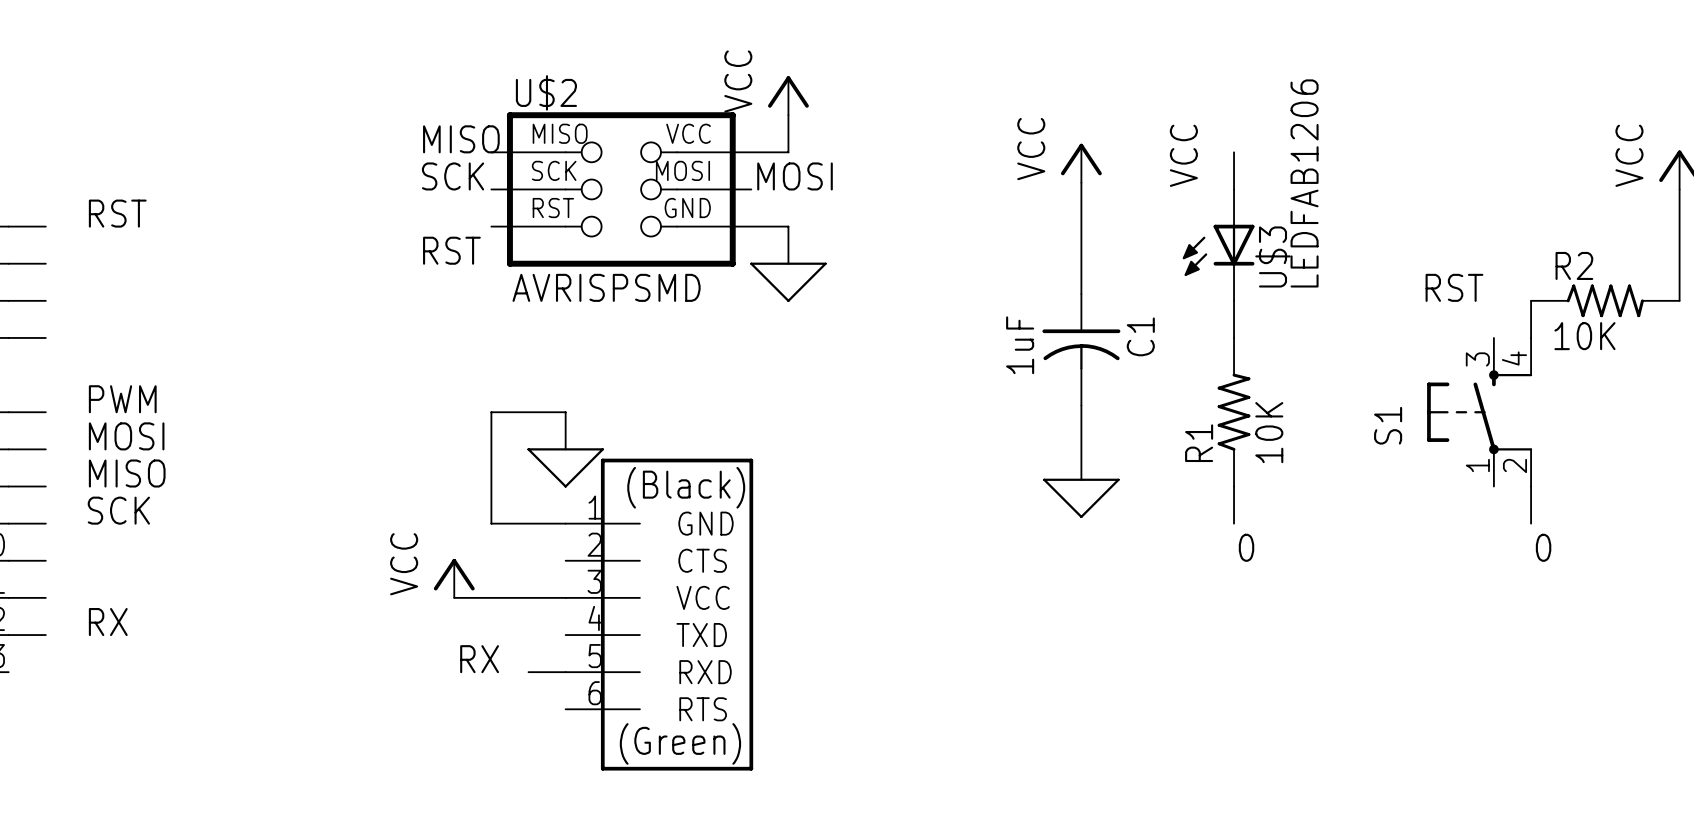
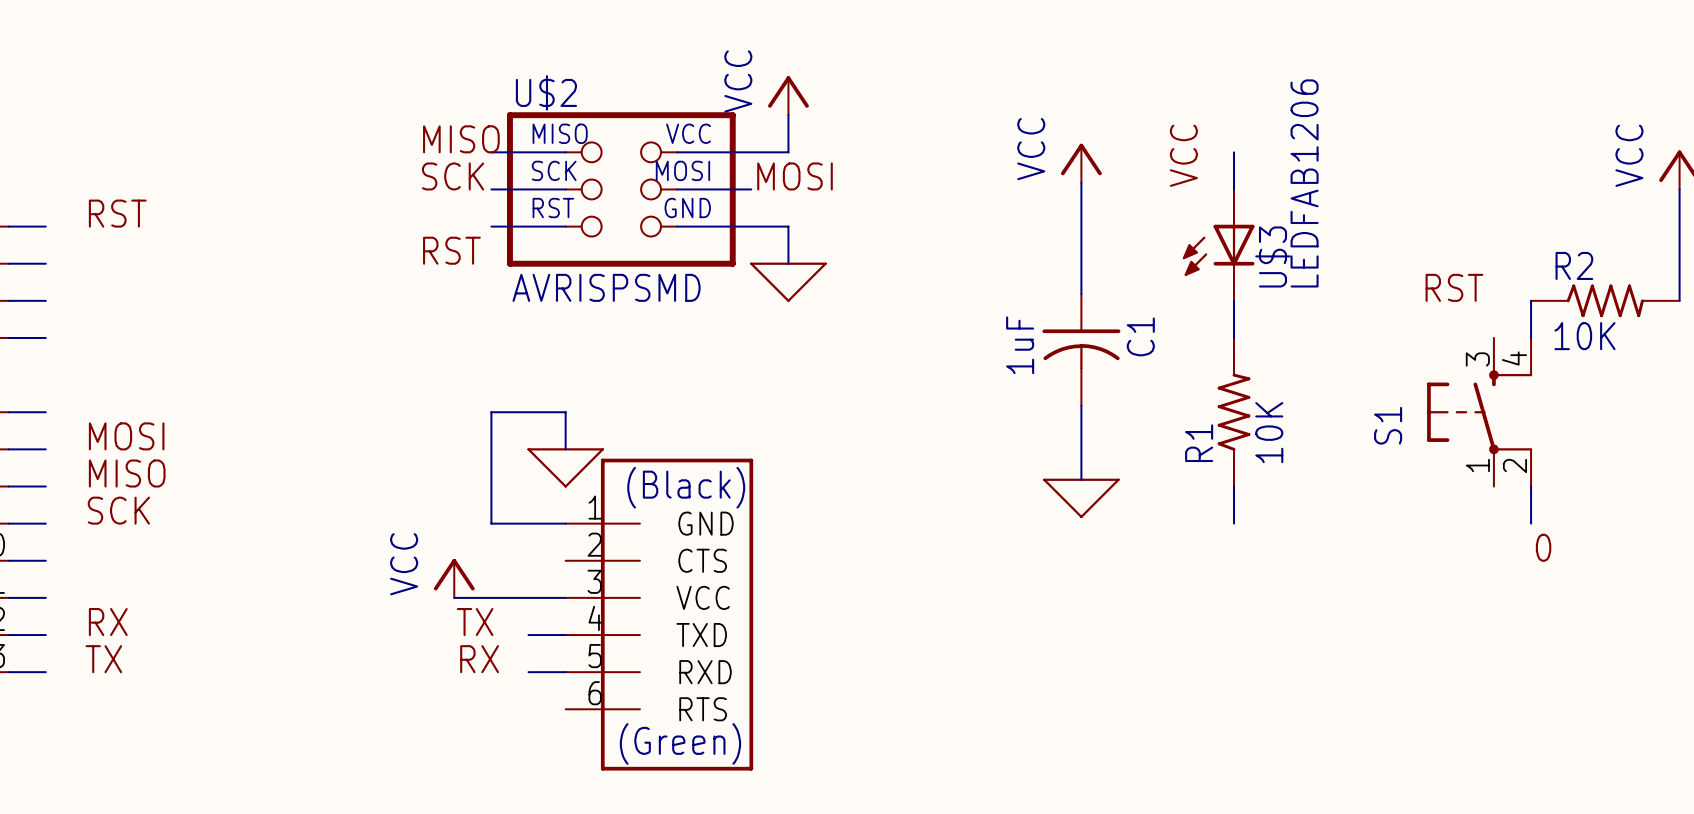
label: PWM (122, 399) -> none
label: 0 (1246, 547) -> none
label: none -> TX (475, 622)
wire: none -> (528, 635) (565, 635)
label: none -> TX (103, 659)
wire: none -> (8, 672) (45, 672)

